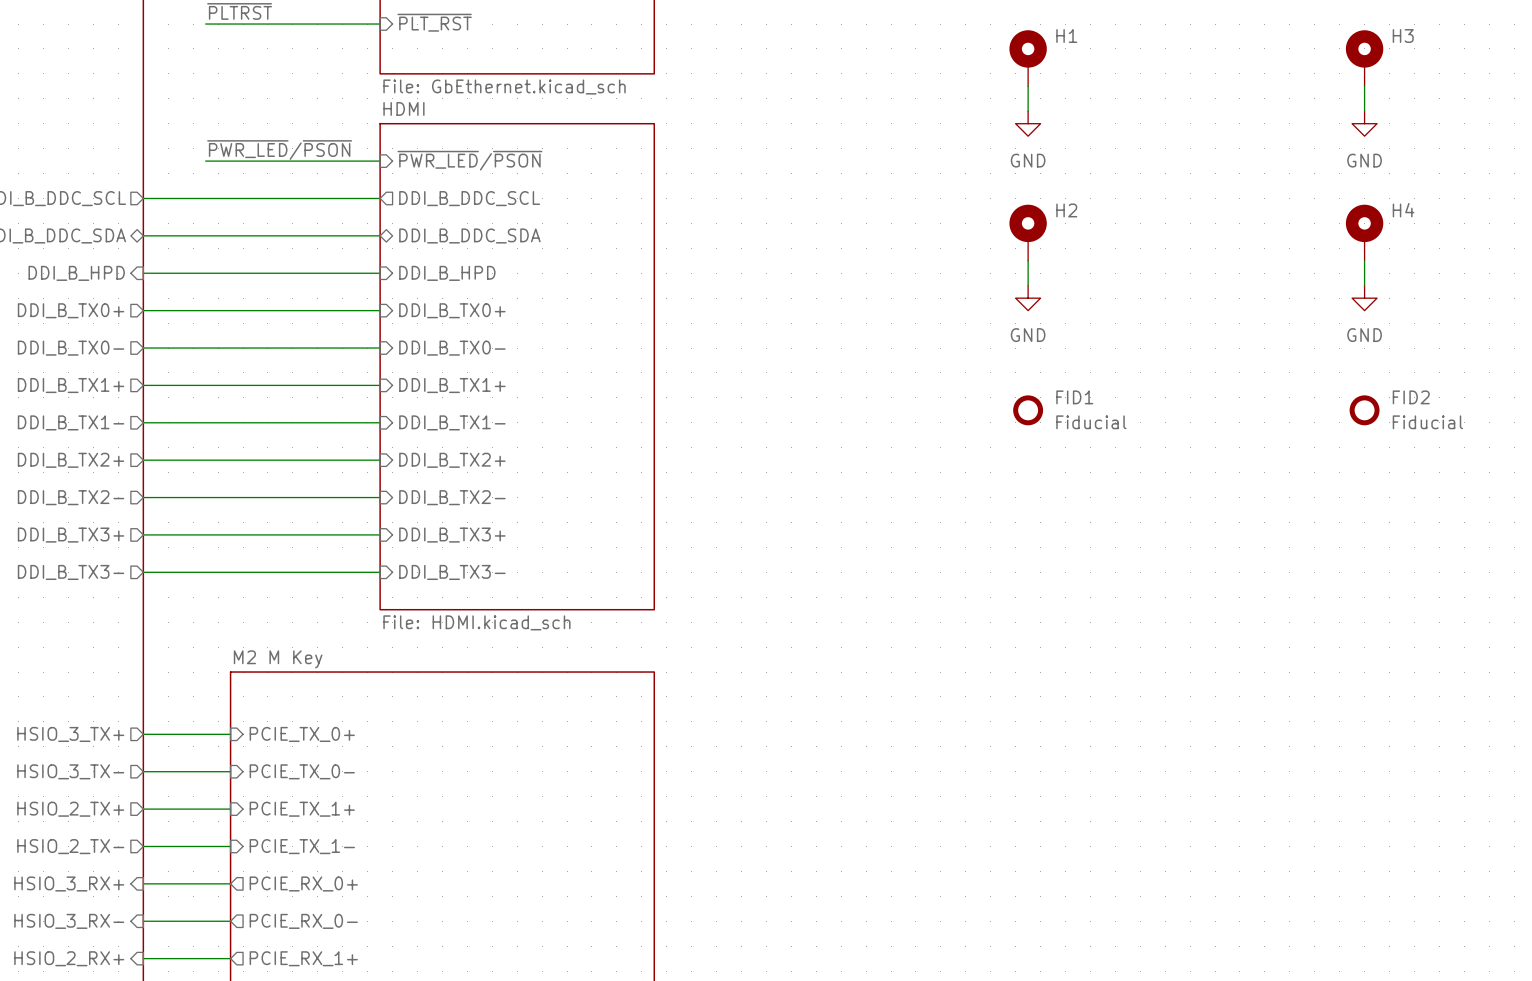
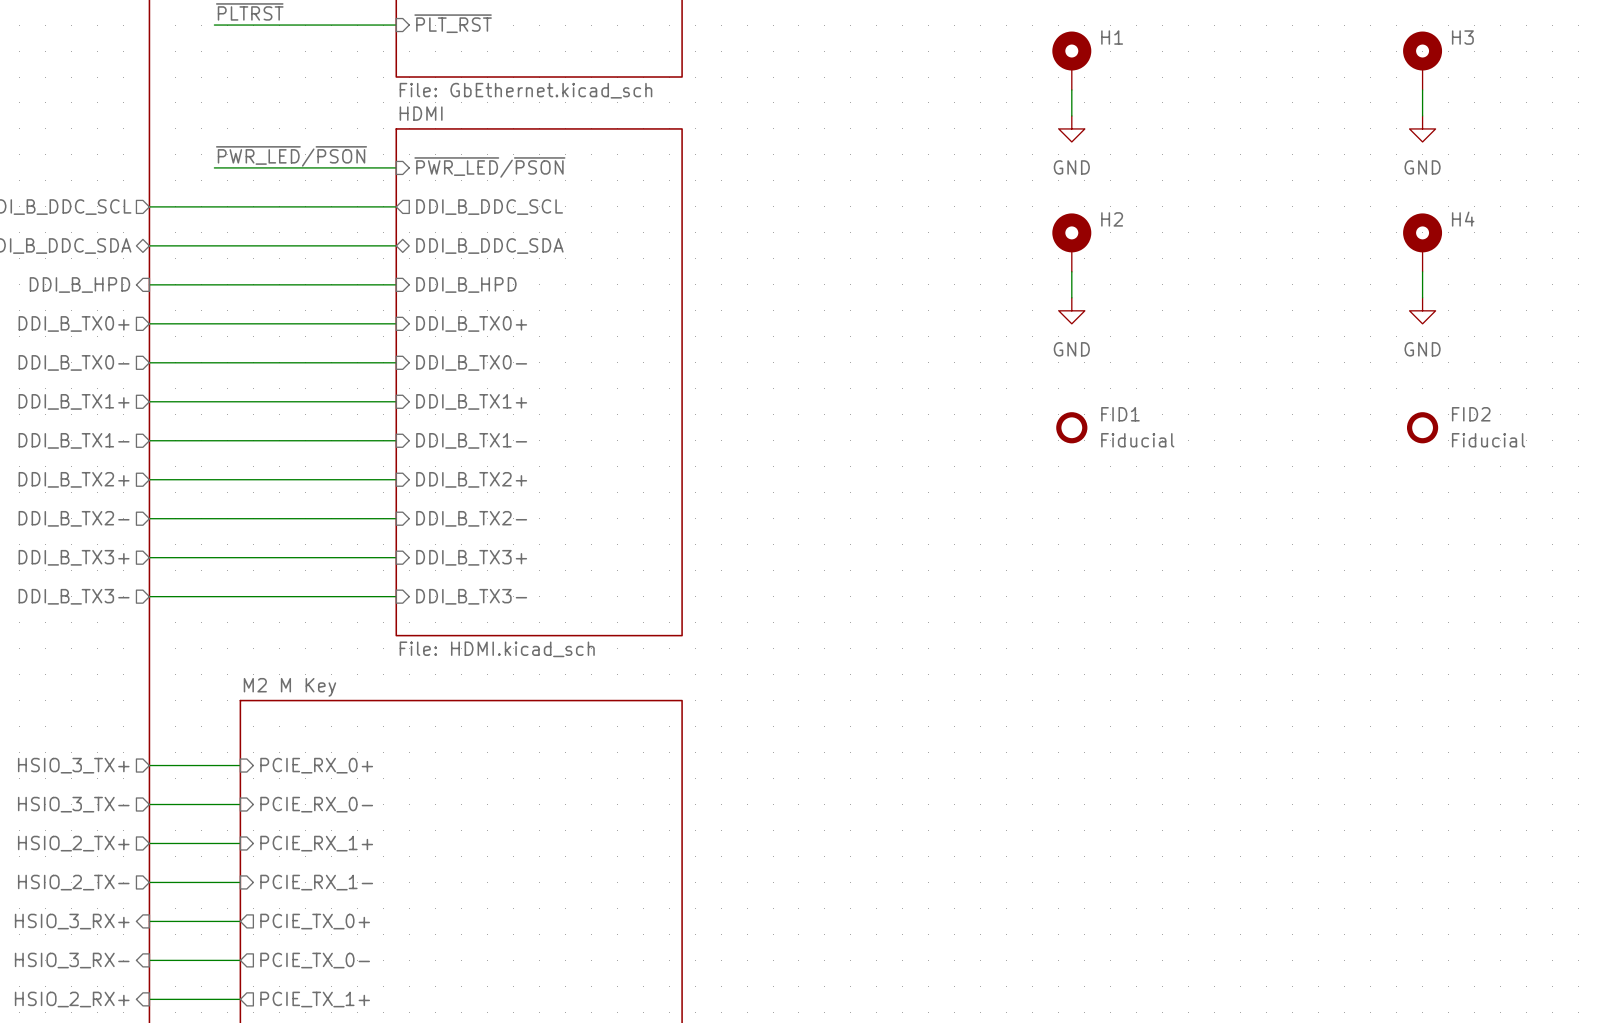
sheet pin: PCIE_TX_0+ (302, 734) -> PCIE_RX_0+ (316, 765)
sheet pin: PCIE_TX_0- (302, 771) -> PCIE_RX_0- (316, 804)
sheet pin: PCIE_TX_1+ (302, 809) -> PCIE_RX_1+ (316, 843)
sheet pin: PCIE_TX_1- (302, 846) -> PCIE_RX_1- (316, 882)
sheet pin: PCIE_RX_0+ (303, 883) -> PCIE_TX_0+ (315, 921)
sheet pin: PCIE_RX_0- (303, 921) -> PCIE_TX_0- (315, 960)
sheet pin: PCIE_RX_1+ (303, 958) -> PCIE_TX_1+ (315, 999)

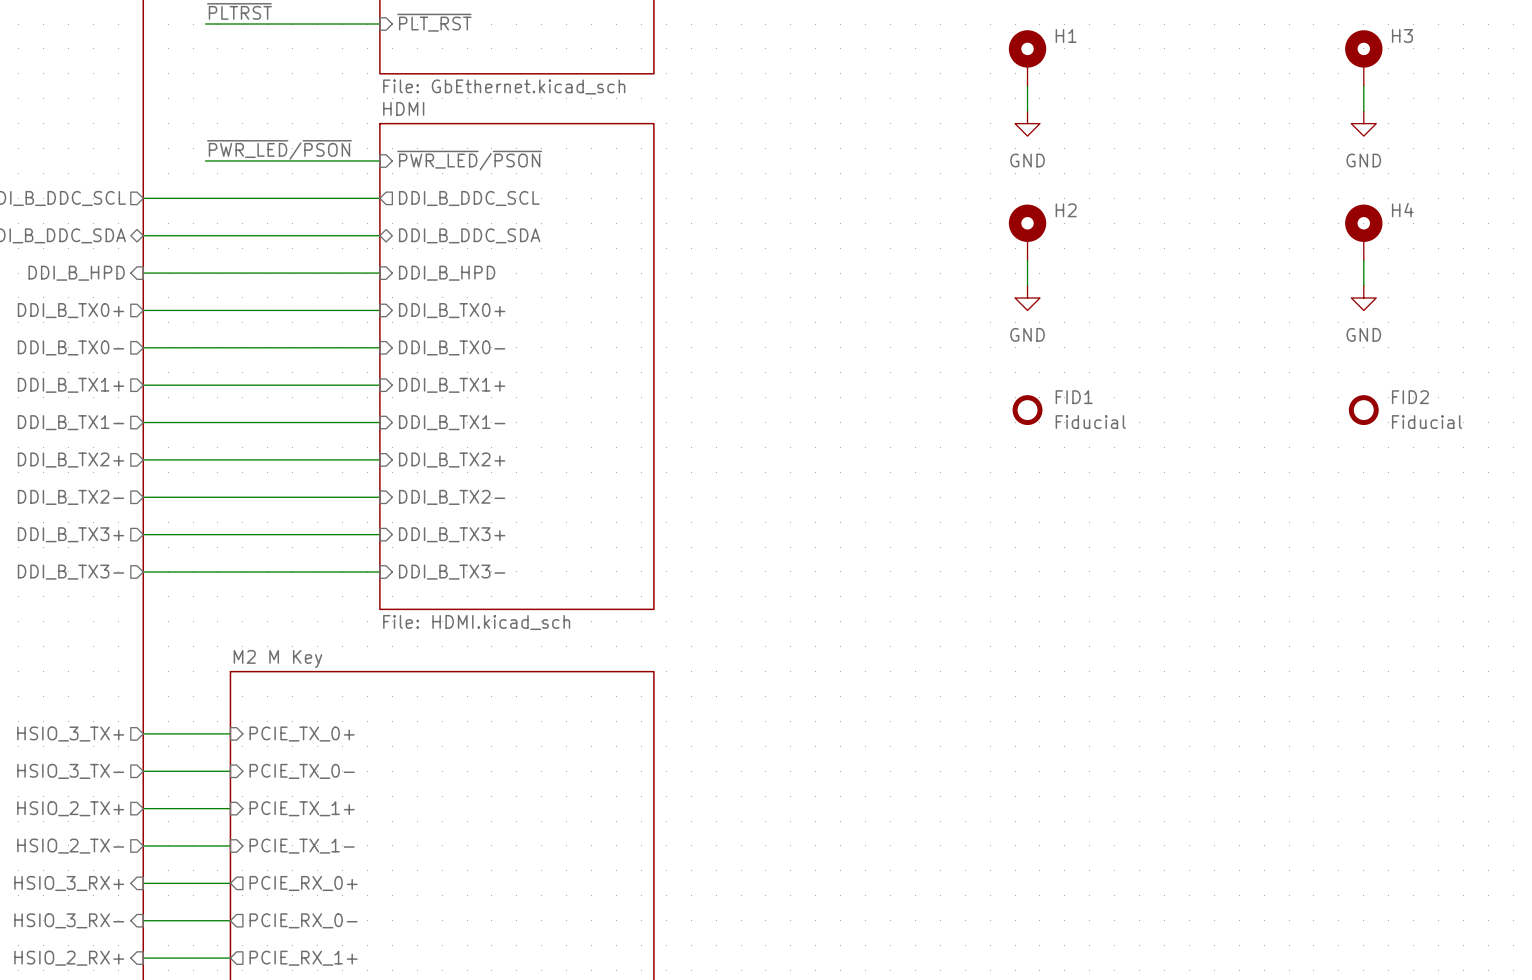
sheet pin: PCIE_RX_0+ (316, 765) -> PCIE_TX_0+ (302, 734)
sheet pin: PCIE_RX_0- (316, 804) -> PCIE_TX_0- (302, 771)
sheet pin: PCIE_RX_1+ (316, 843) -> PCIE_TX_1+ (302, 808)
sheet pin: PCIE_RX_1- (316, 882) -> PCIE_TX_1- (302, 846)
sheet pin: PCIE_TX_0+ (315, 921) -> PCIE_RX_0+ (303, 883)
sheet pin: PCIE_TX_0- (315, 960) -> PCIE_RX_0- (303, 920)
sheet pin: PCIE_TX_1+ (315, 999) -> PCIE_RX_1+ (303, 958)

